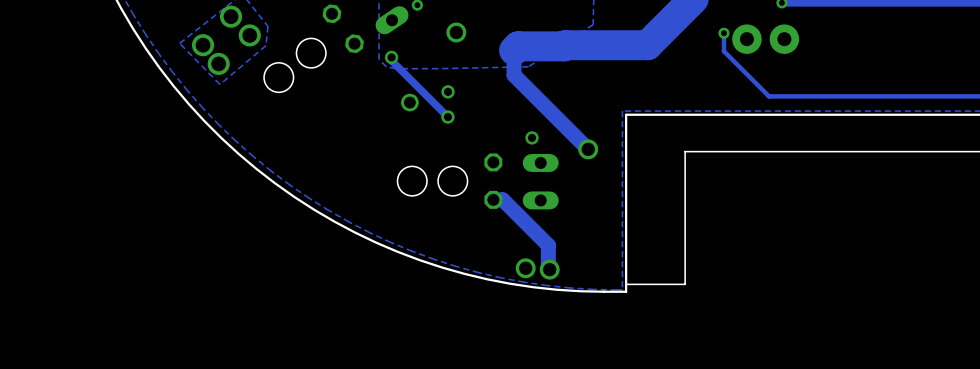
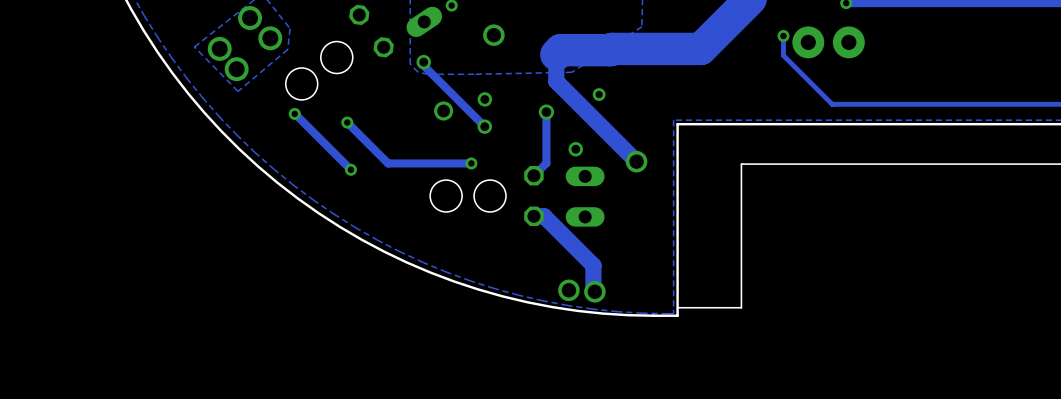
via: none -> (599, 94)
track: none -> (546, 112) (546, 163) (533, 175)
via: none -> (546, 112)
track: none -> (295, 113) (350, 169)
via: none -> (294, 113)
track: none -> (347, 122) (388, 163) (471, 163)
via: none -> (347, 122)
via: none -> (471, 163)
via: none -> (350, 169)

